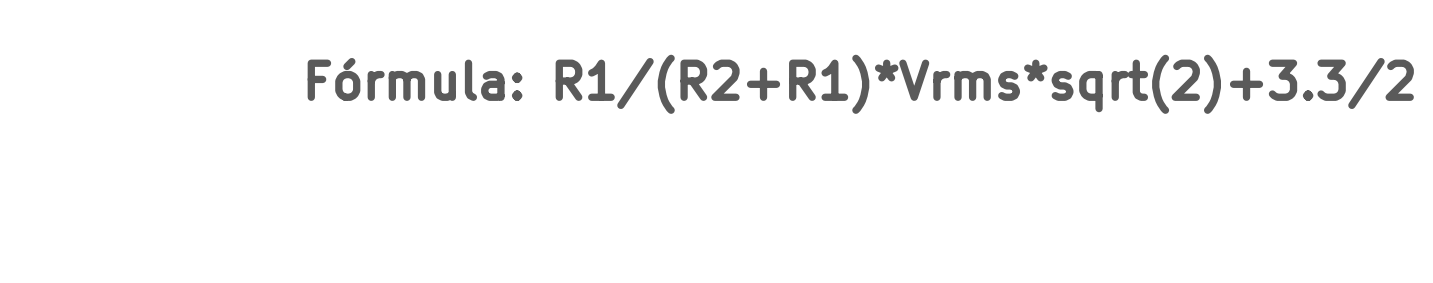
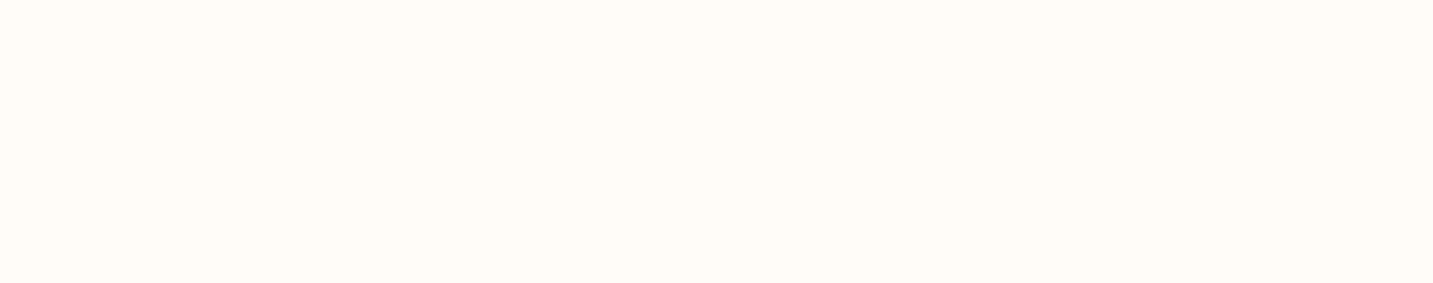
text: Fórmula: R1/(R2+R1)*Vrms*sqrt(2)+3.3/2 (860, 84) -> none

